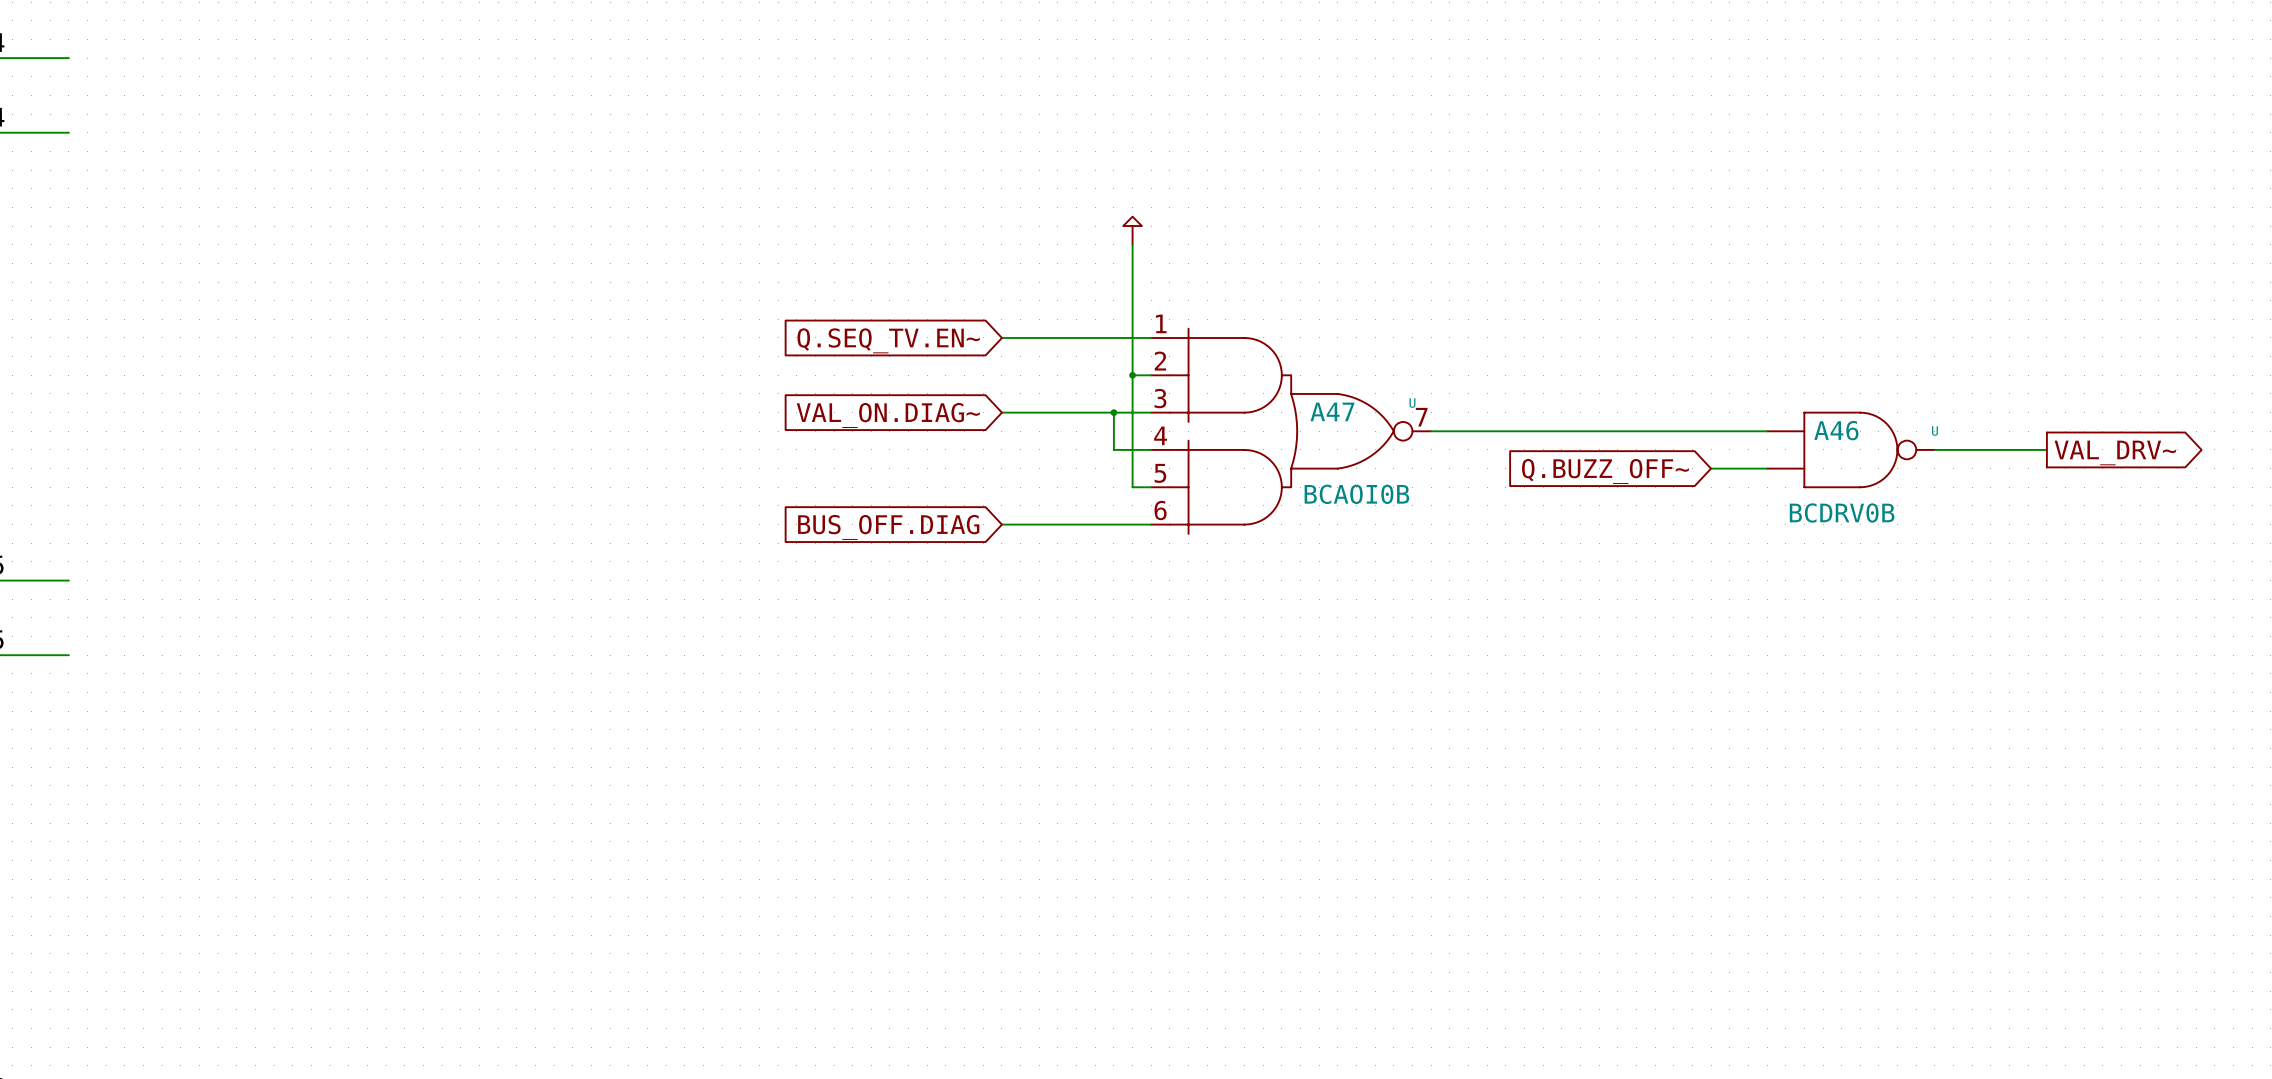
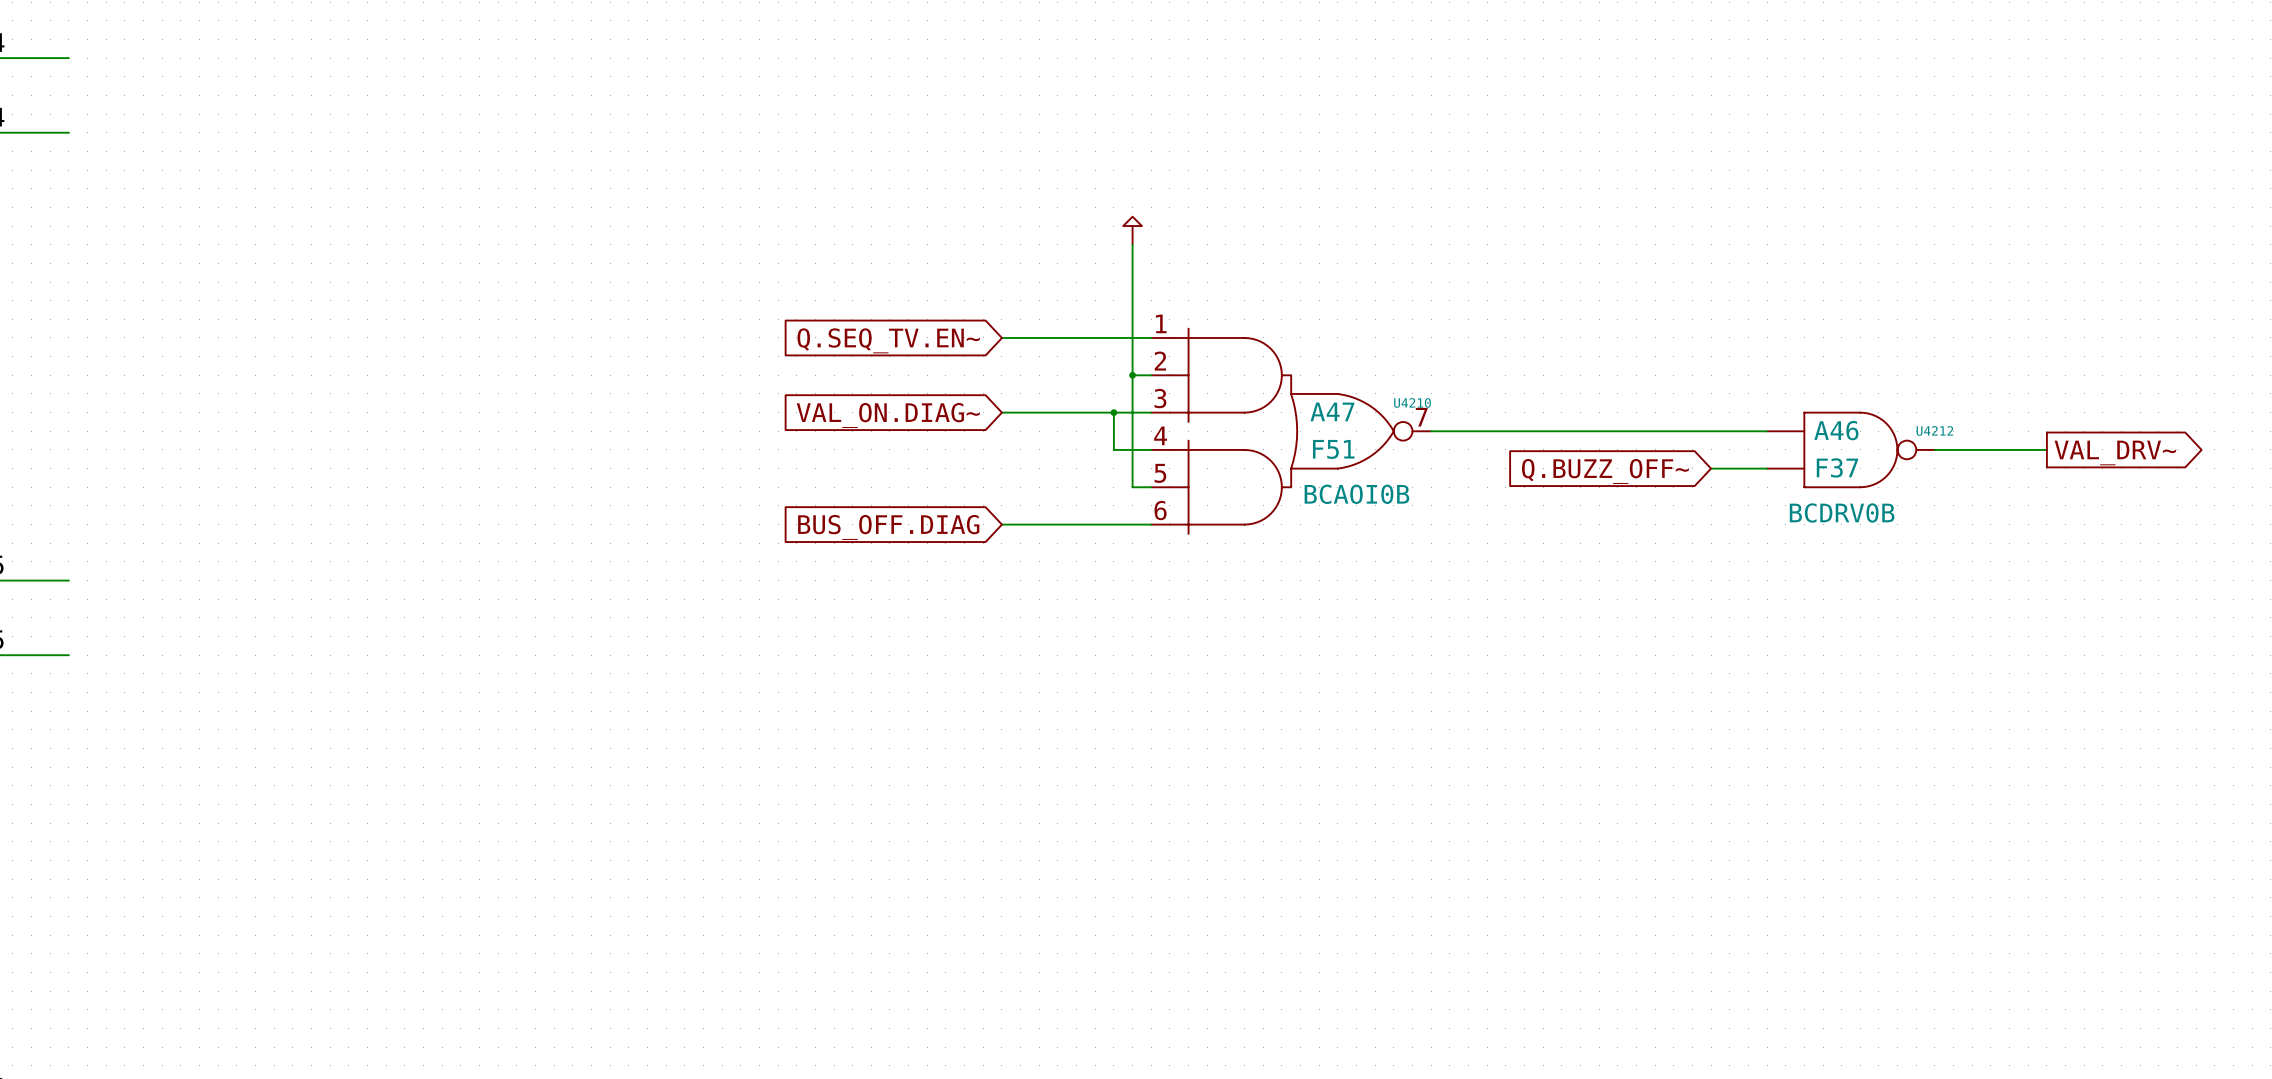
U name: U (1412, 403) -> U4210 (1412, 402)
U name: U (1934, 431) -> U4212 (1934, 430)
U value: none -> F51 (1333, 449)
U value: none -> F37 (1837, 467)

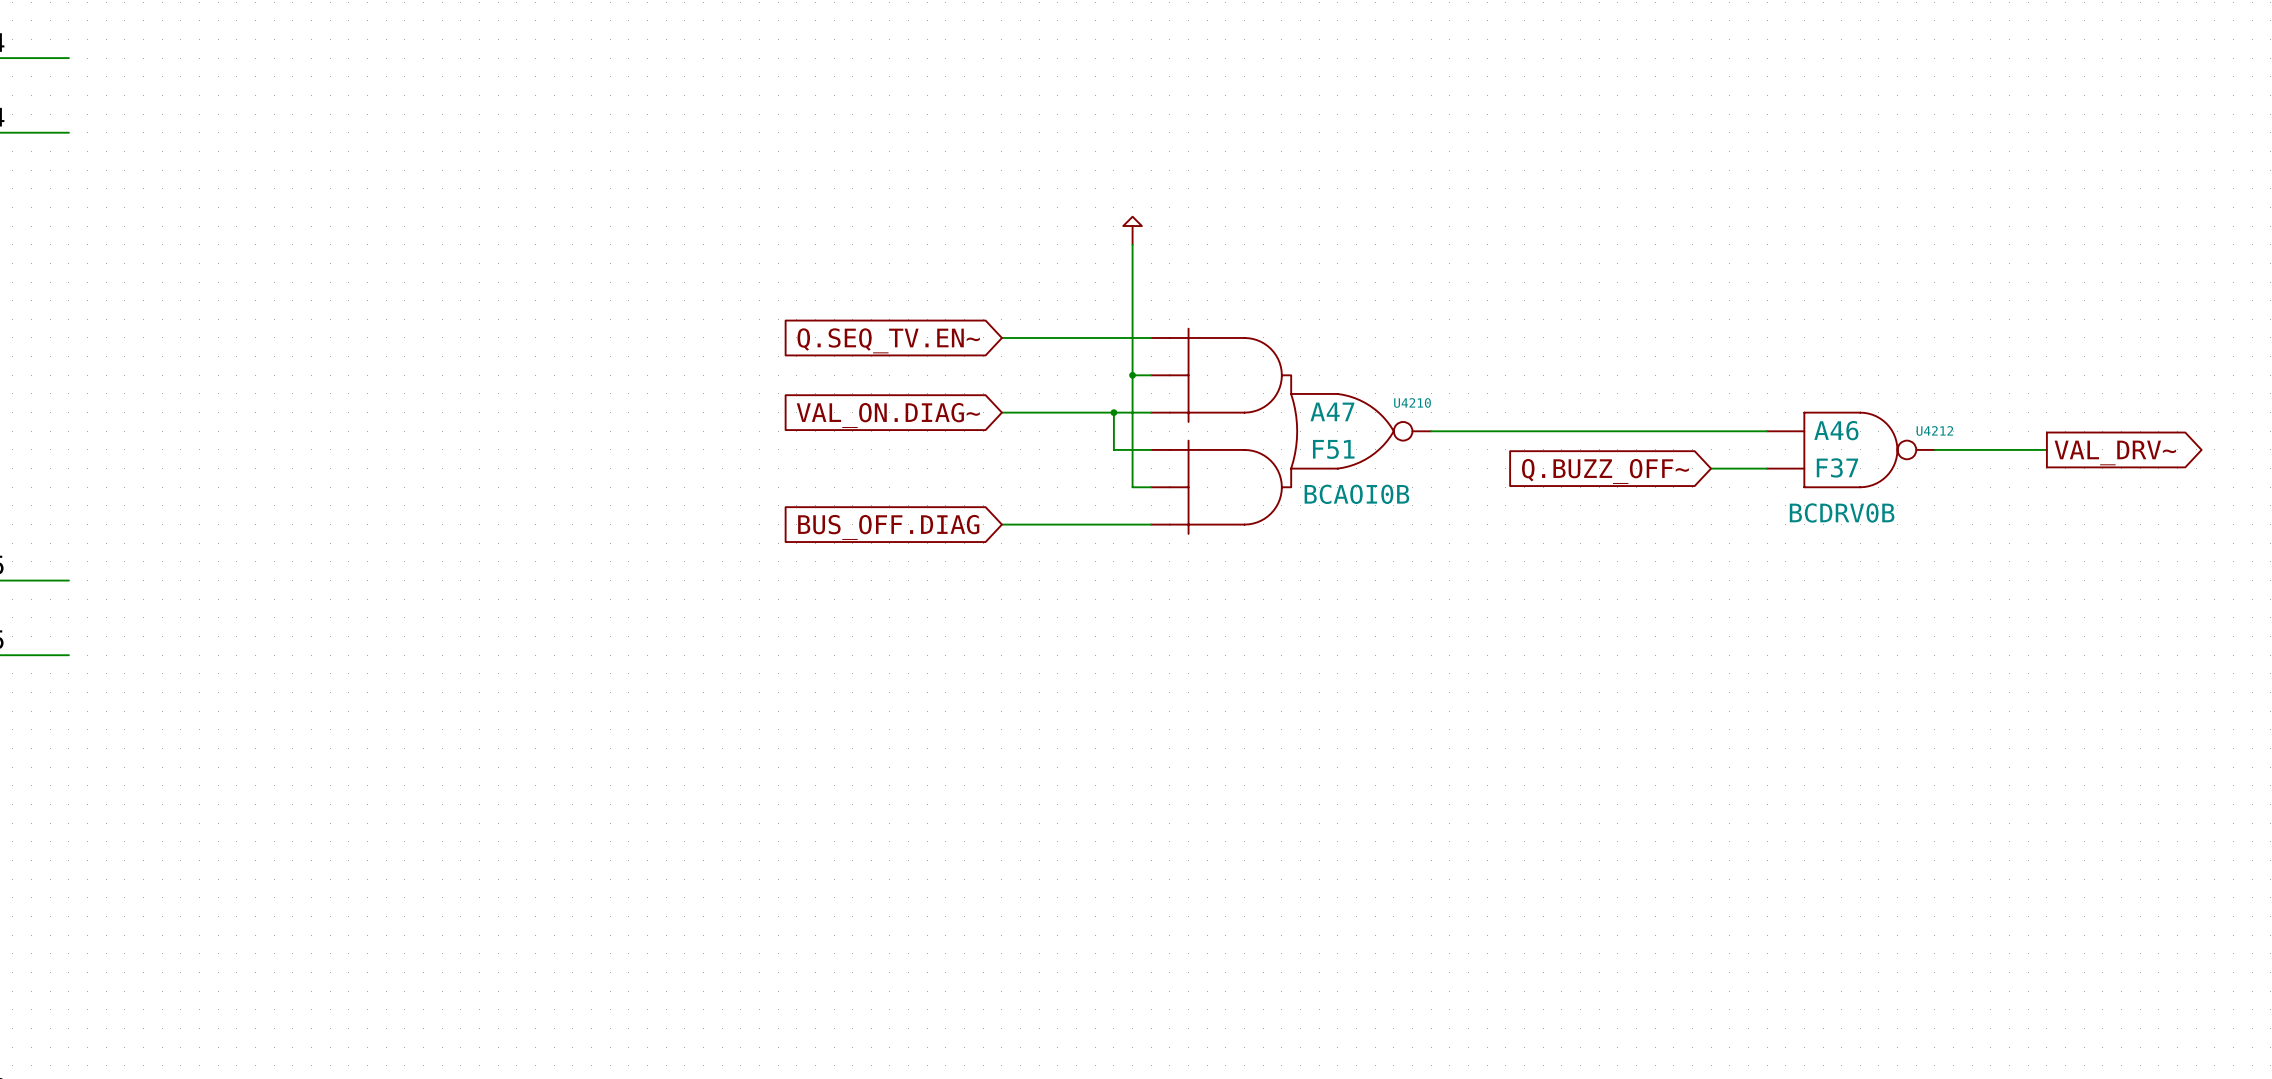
U4210 pin number: 1 (1161, 323) -> none
U4210 pin number: 2 (1160, 361) -> none
U4210 pin number: 3 (1160, 398) -> none
U4210 pin number: 7 (1421, 417) -> none
U4210 pin number: 4 (1160, 435) -> none
U4210 pin number: 5 (1160, 473) -> none
U4210 pin number: 6 (1160, 510) -> none

